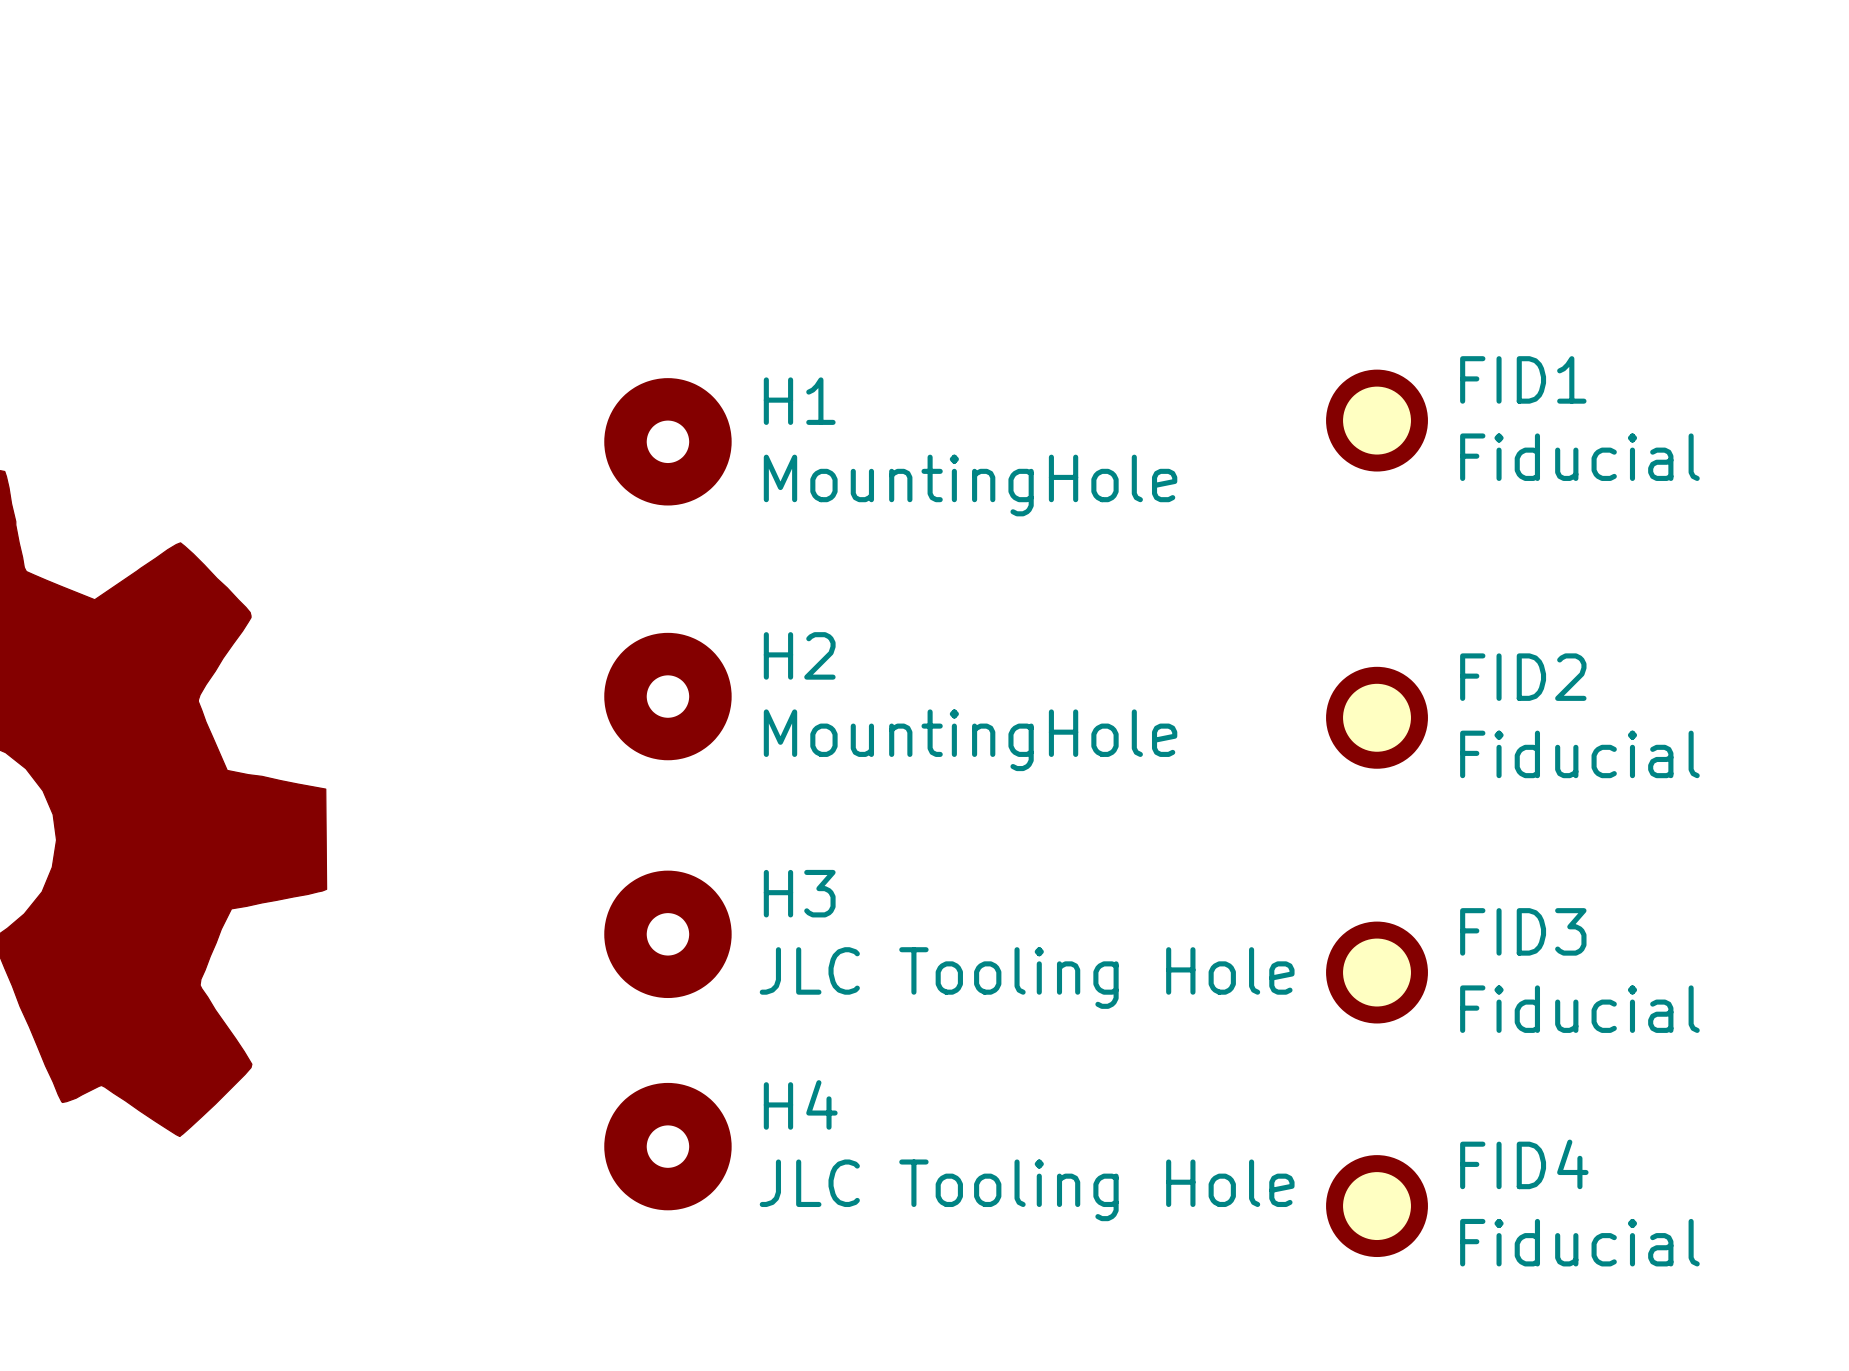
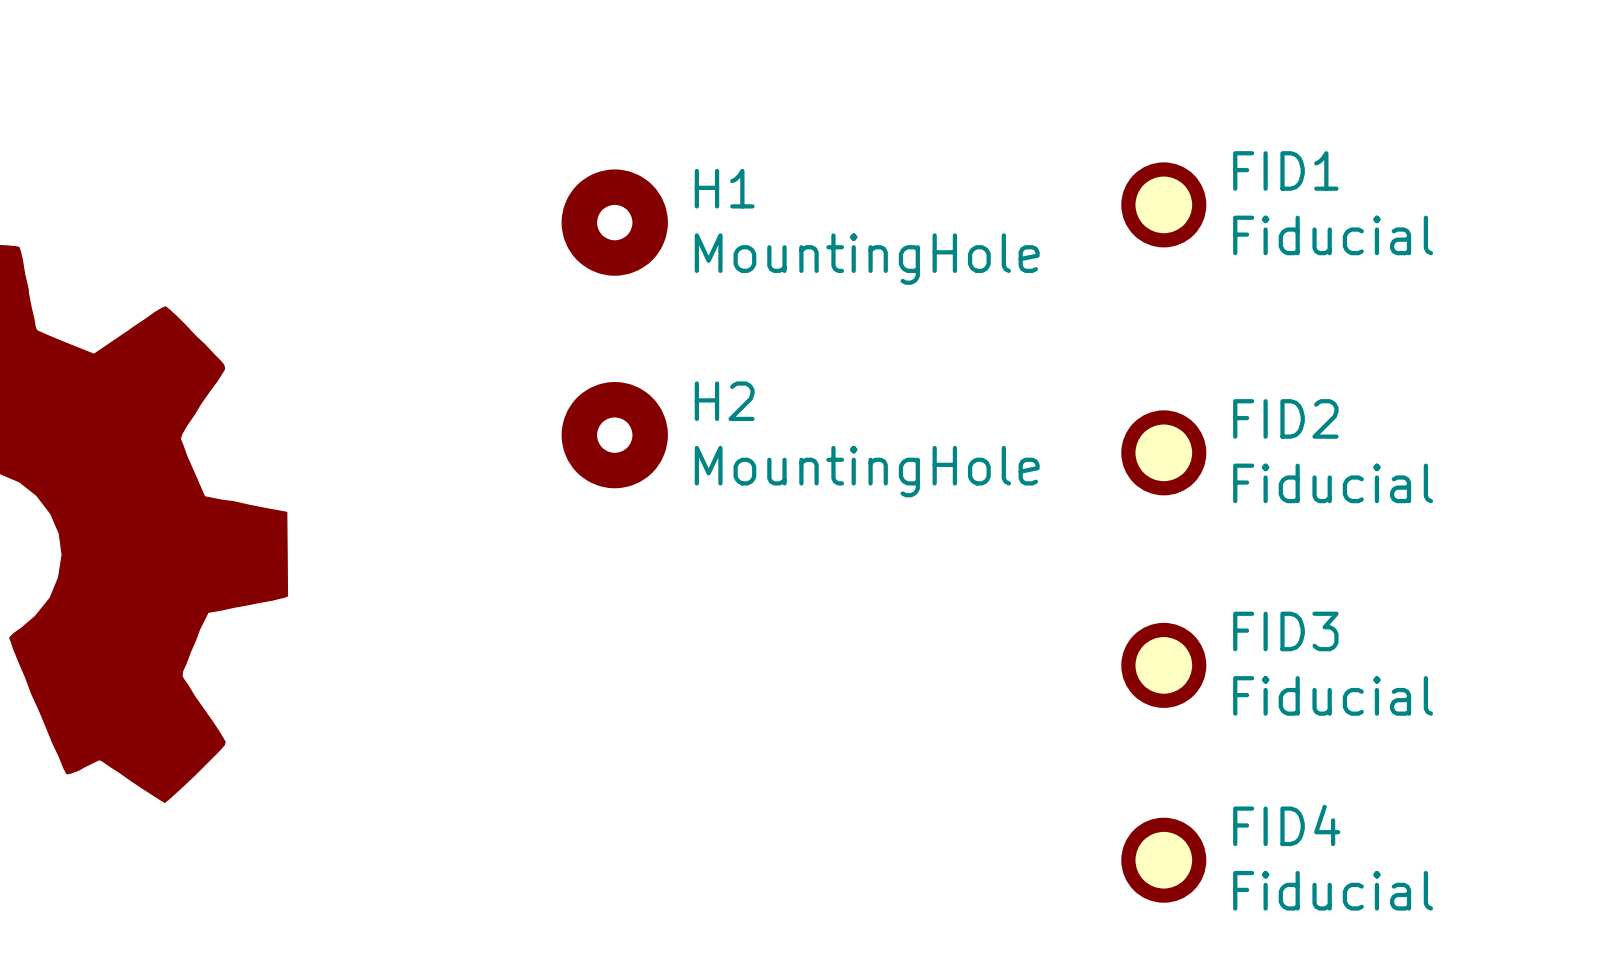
H1 position: (667, 441) -> (614, 222)
H2 position: (667, 696) -> (614, 435)
H3: JLC Tooling Hole (667, 934) -> none
H4: JLC Tooling Hole (667, 1146) -> none

